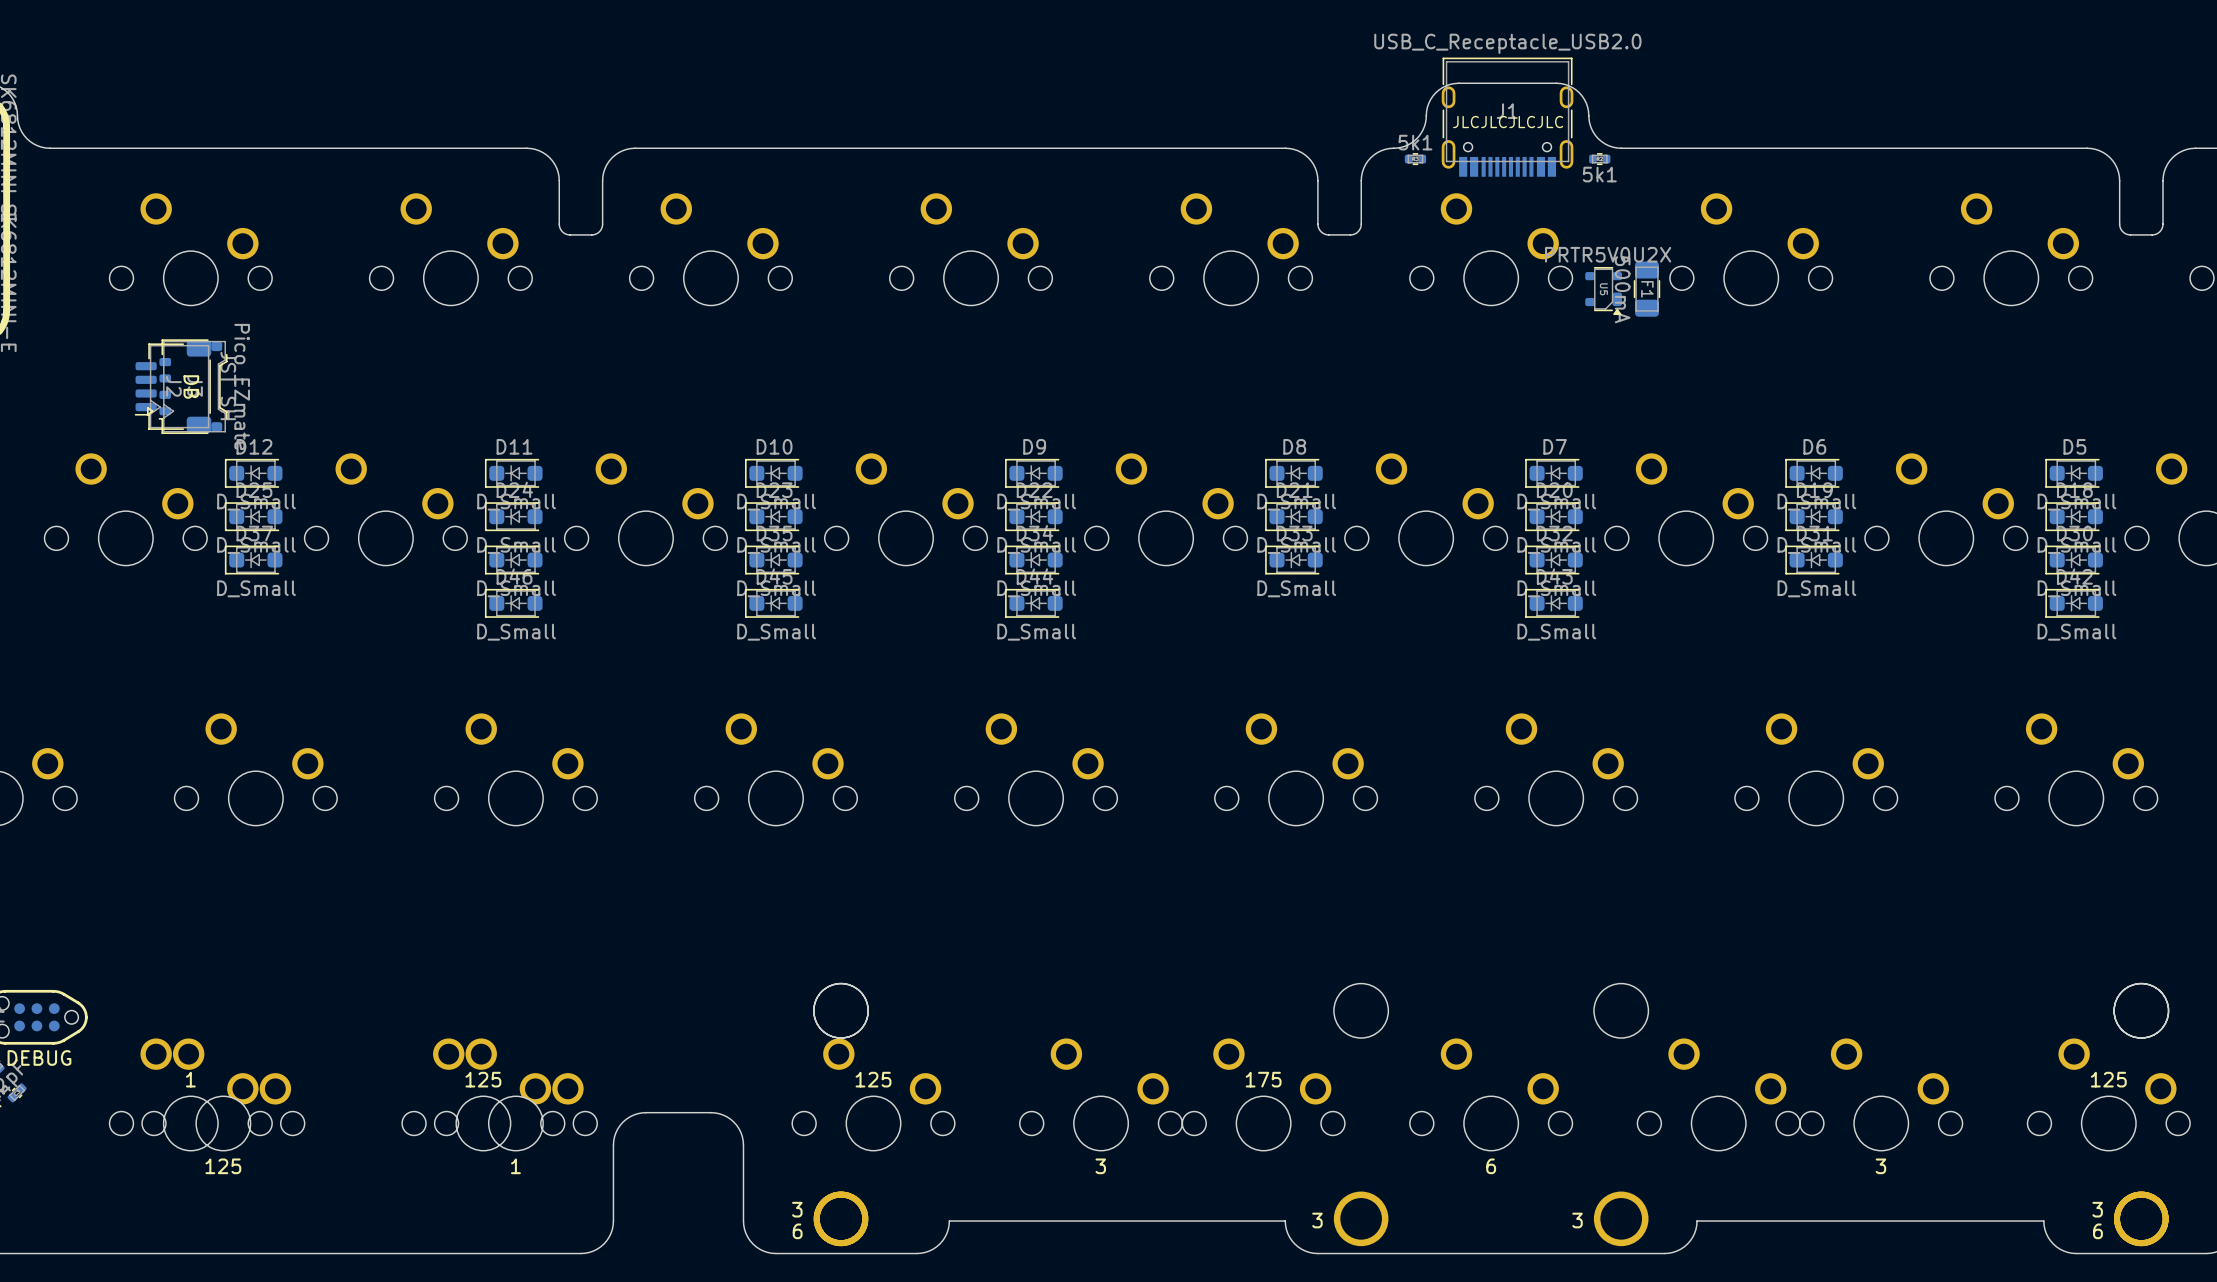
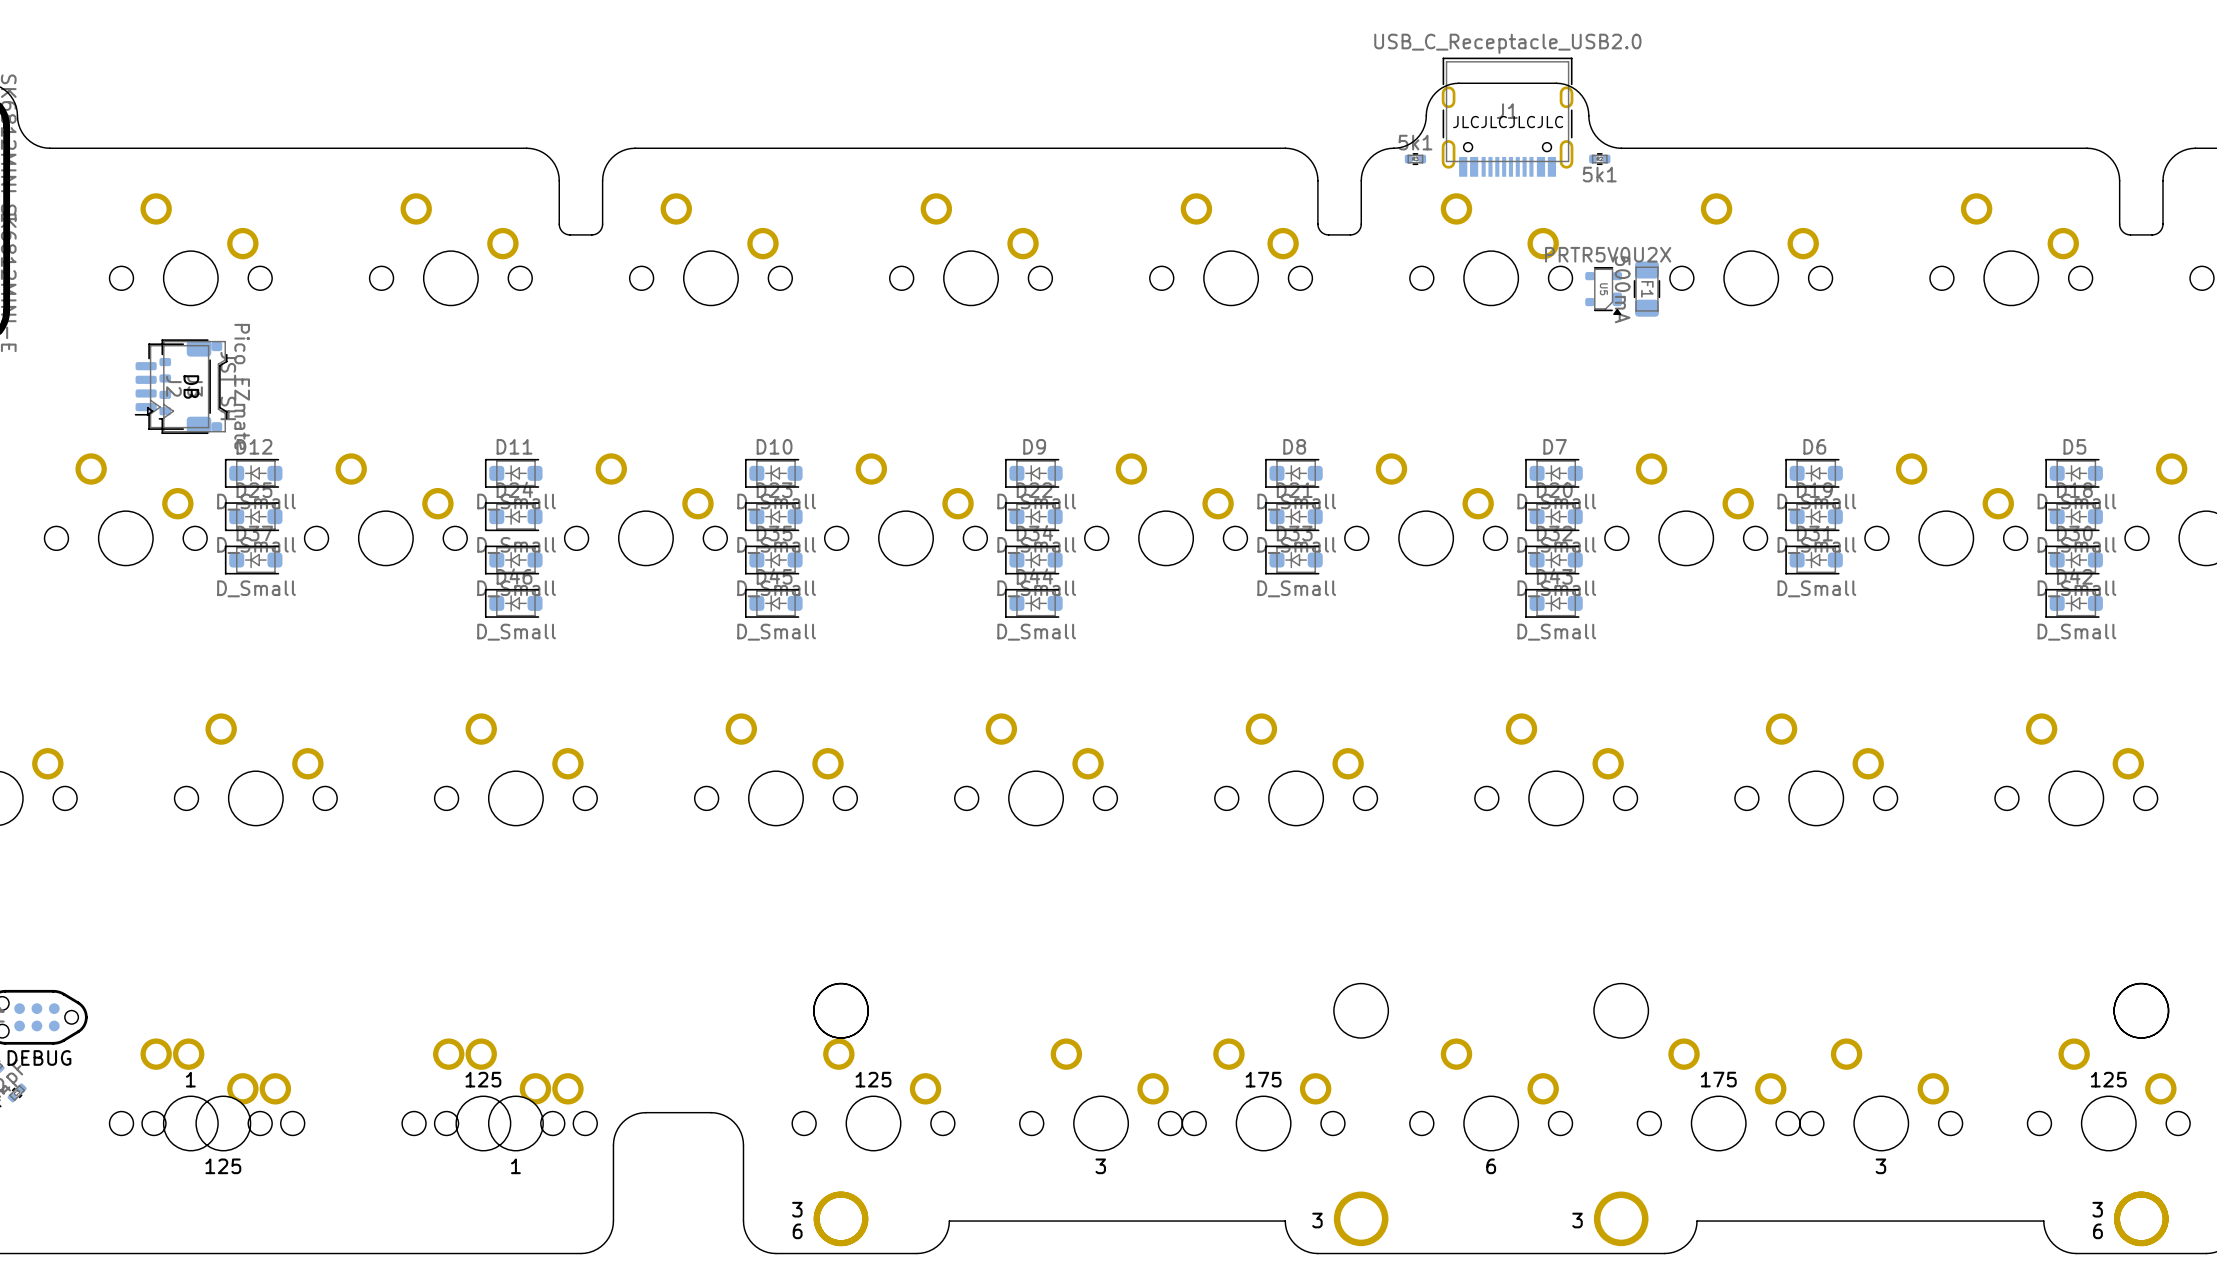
text: none -> 175 (1718, 1079)

